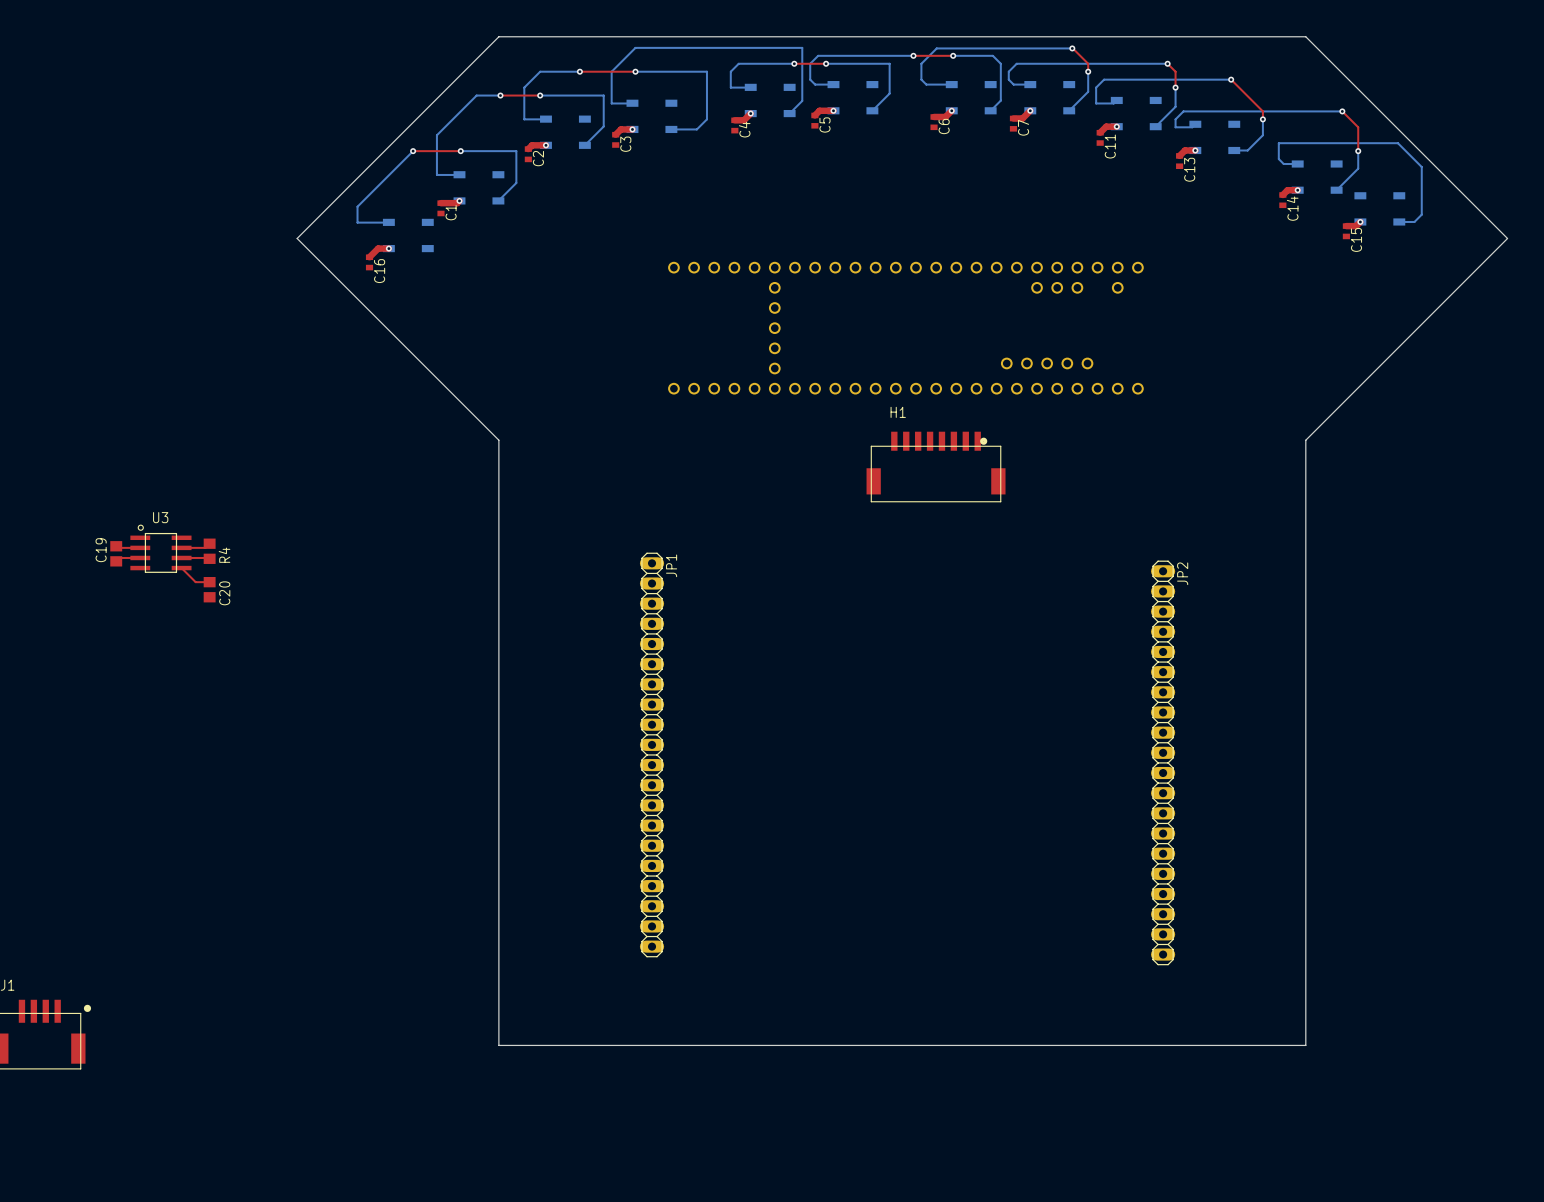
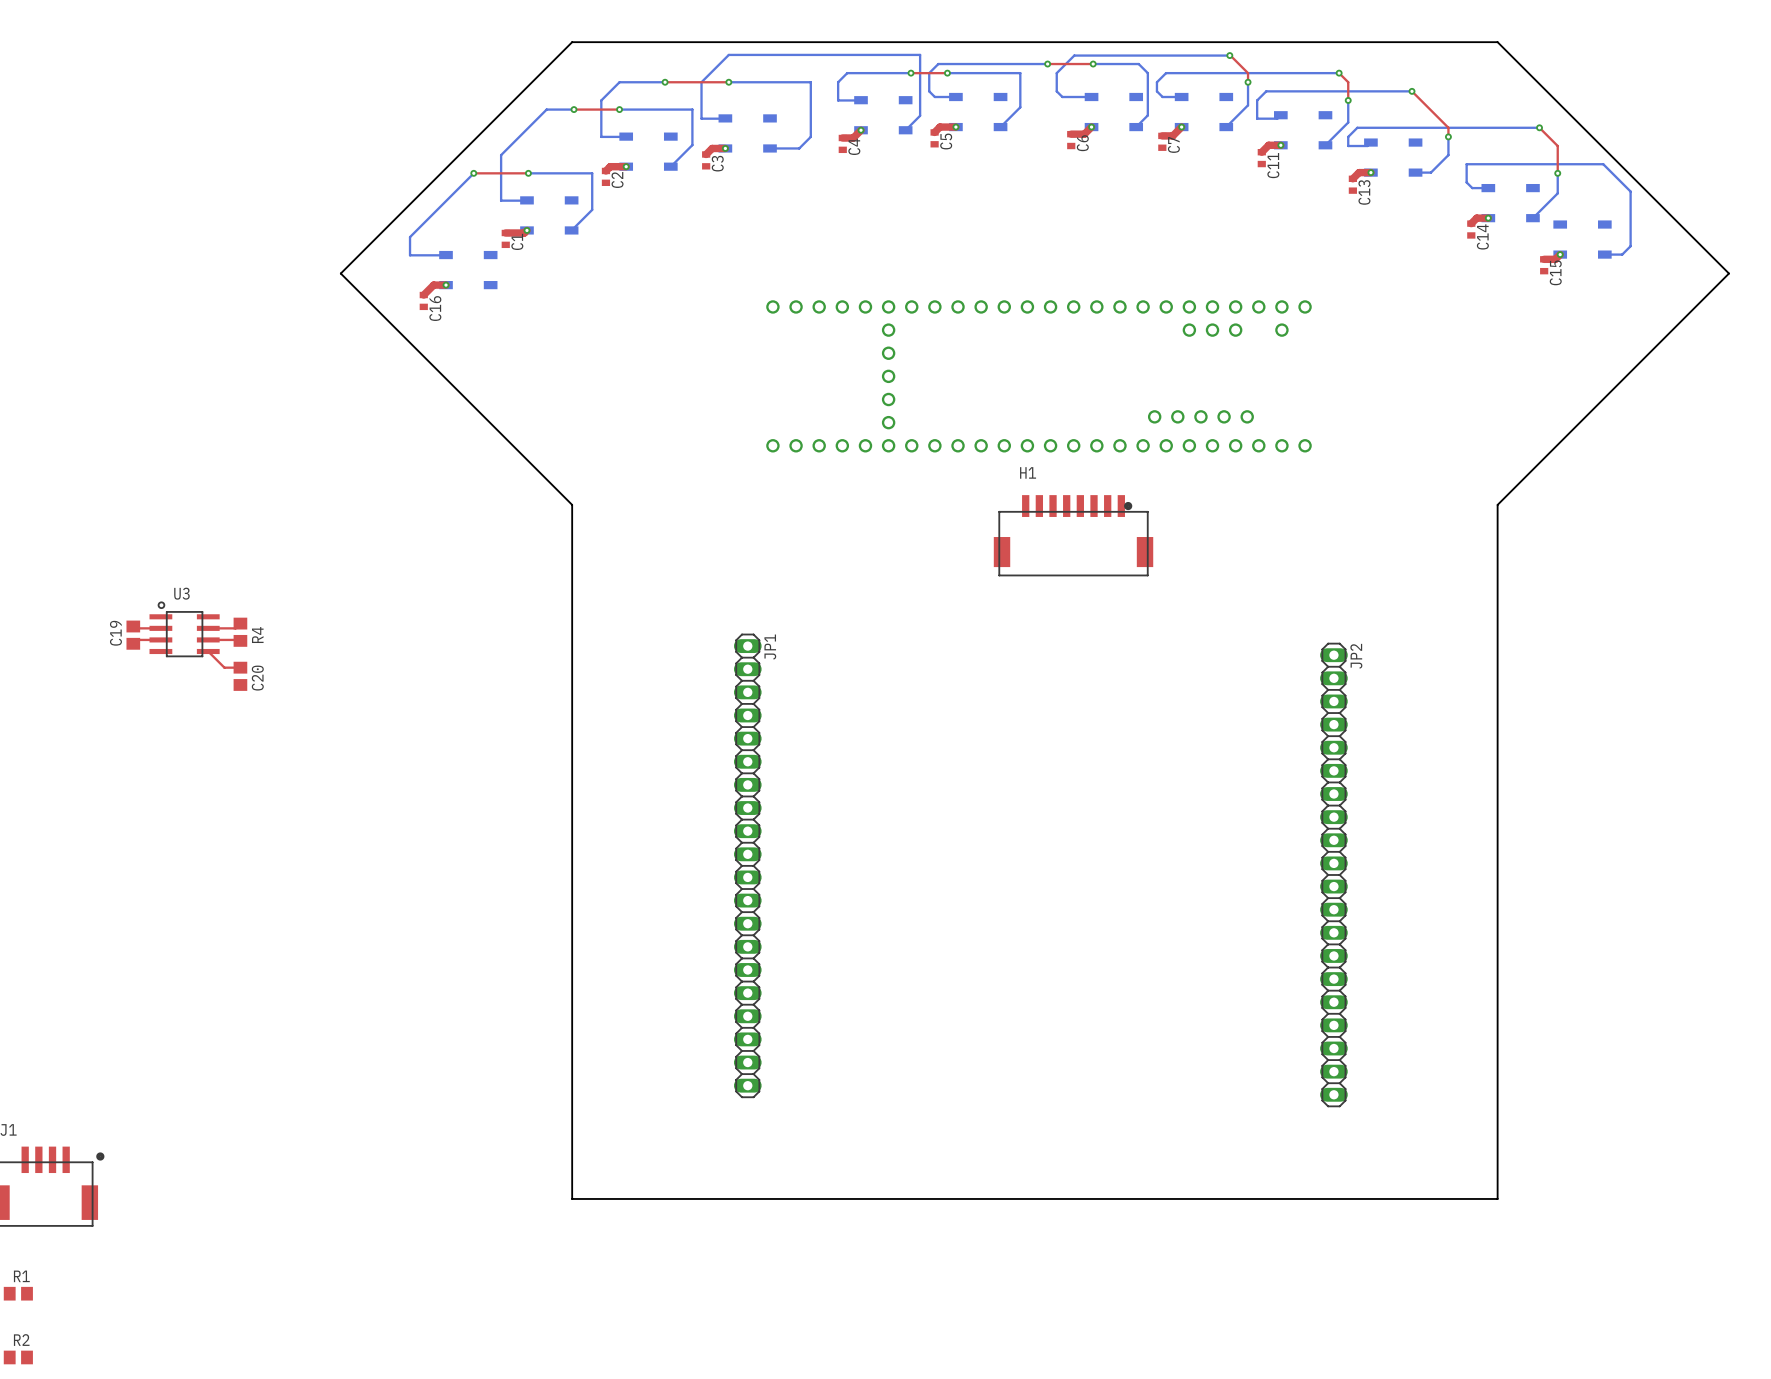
R1: none -> (18, 1293)
R2: none -> (18, 1357)

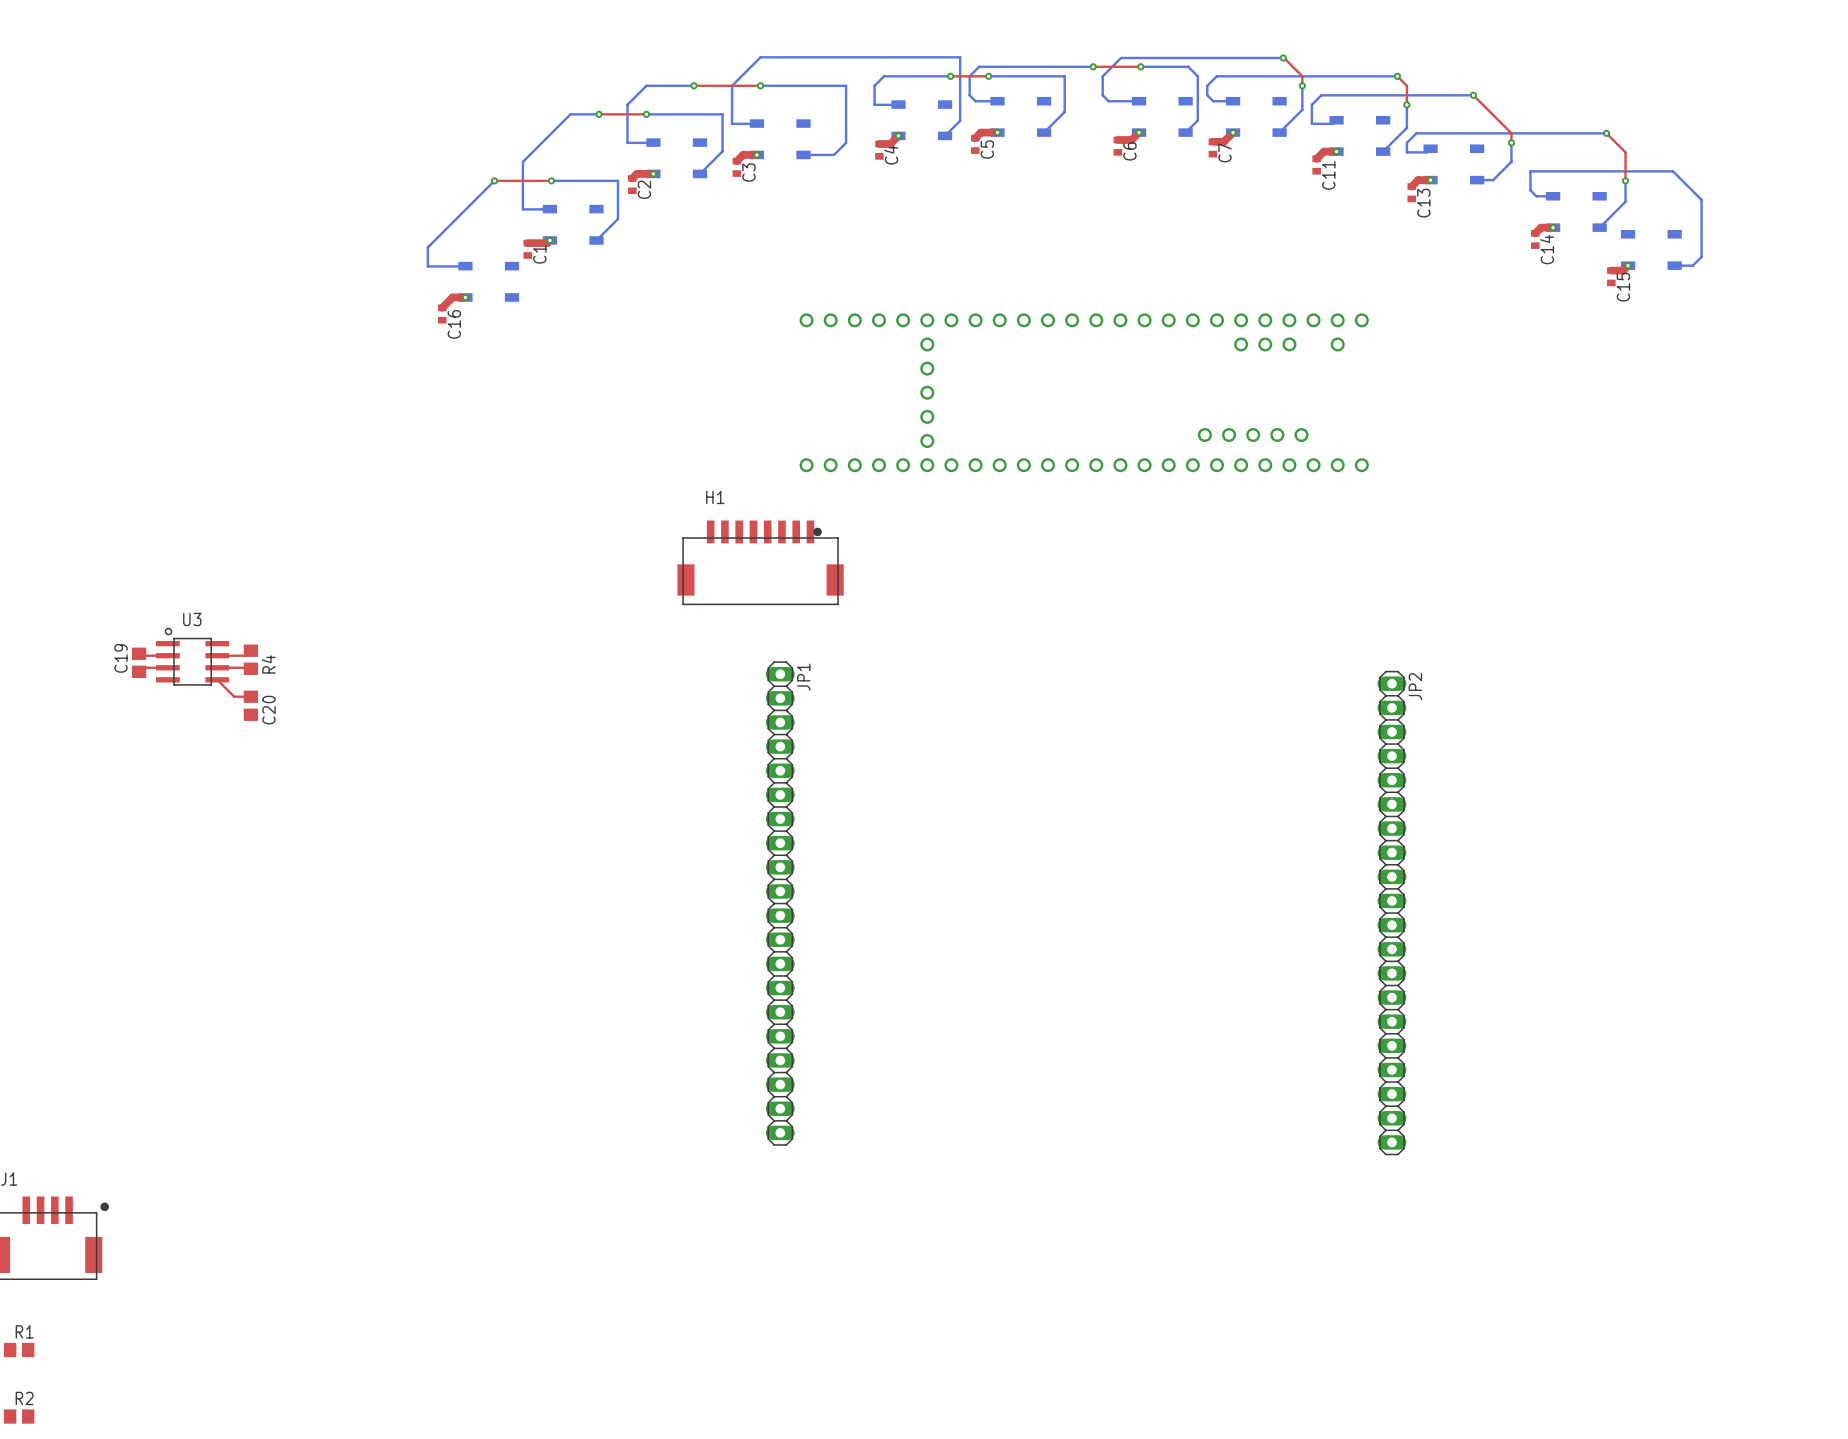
board edge: (572, 42) (1497, 42) (1728, 273) (1497, 504) (1497, 1198) (572, 1198) (572, 504) (340, 273) (572, 42) -> none
H1 position: (1073, 535) -> (760, 562)

